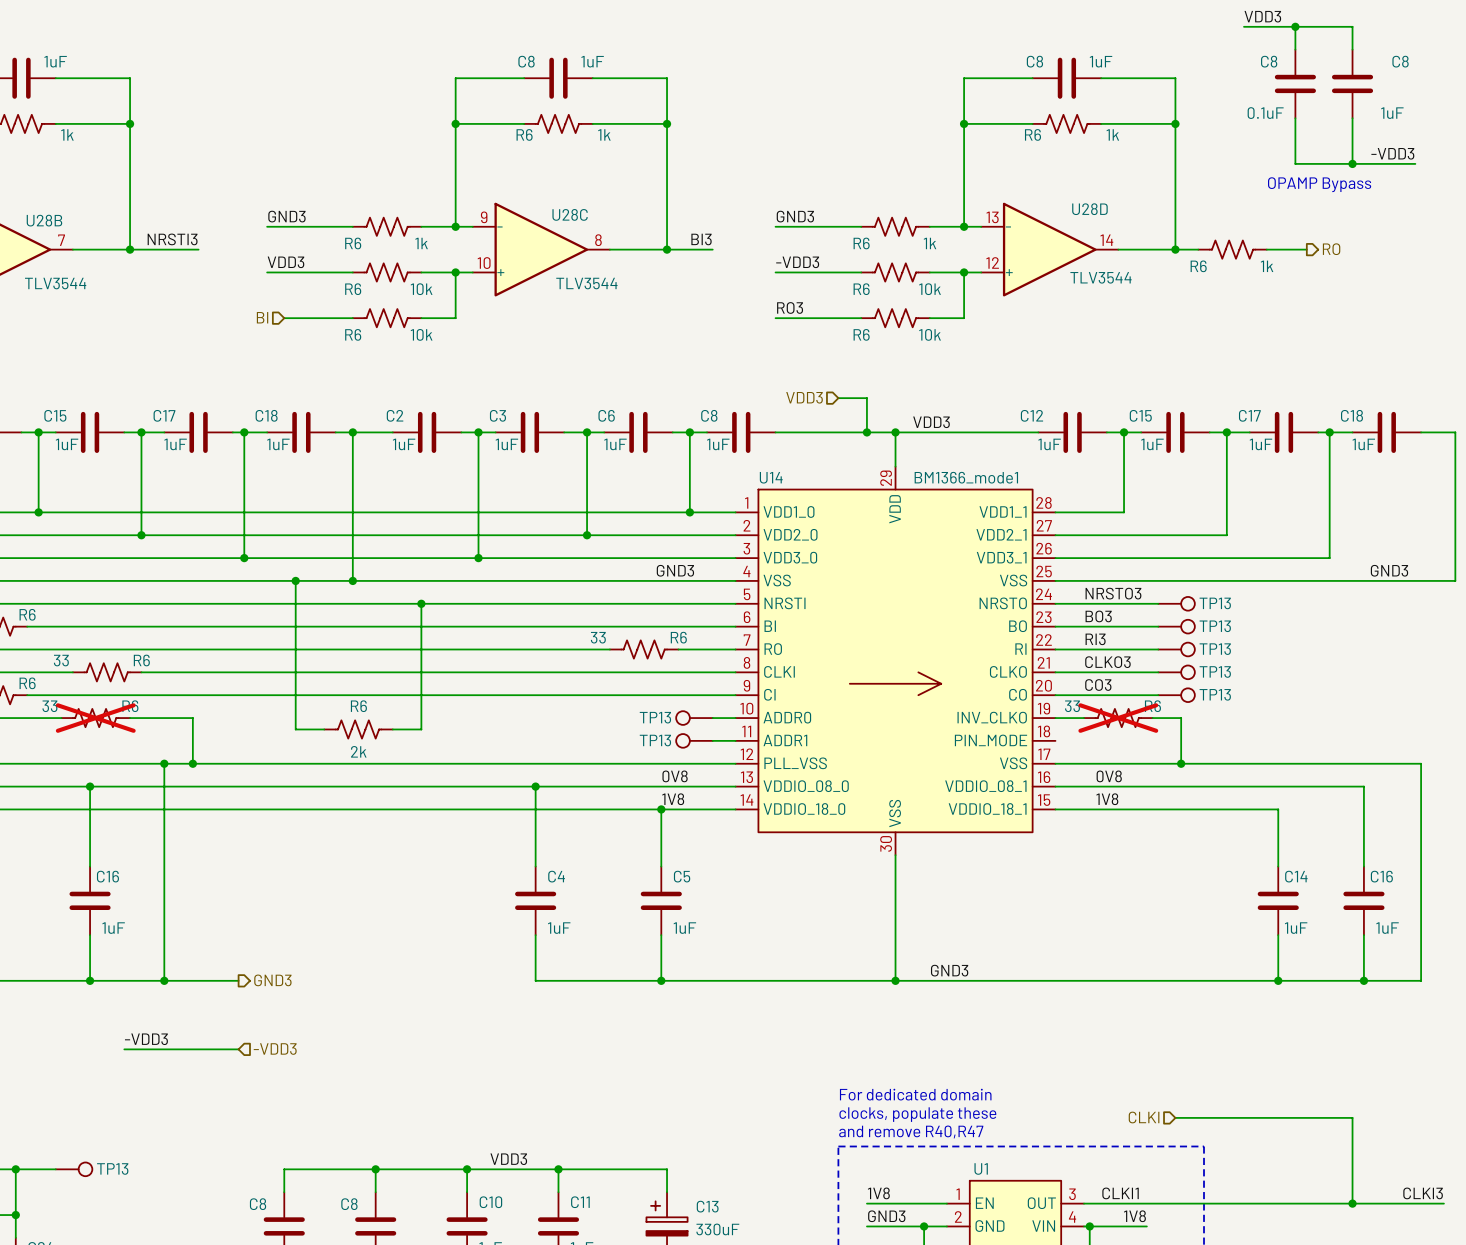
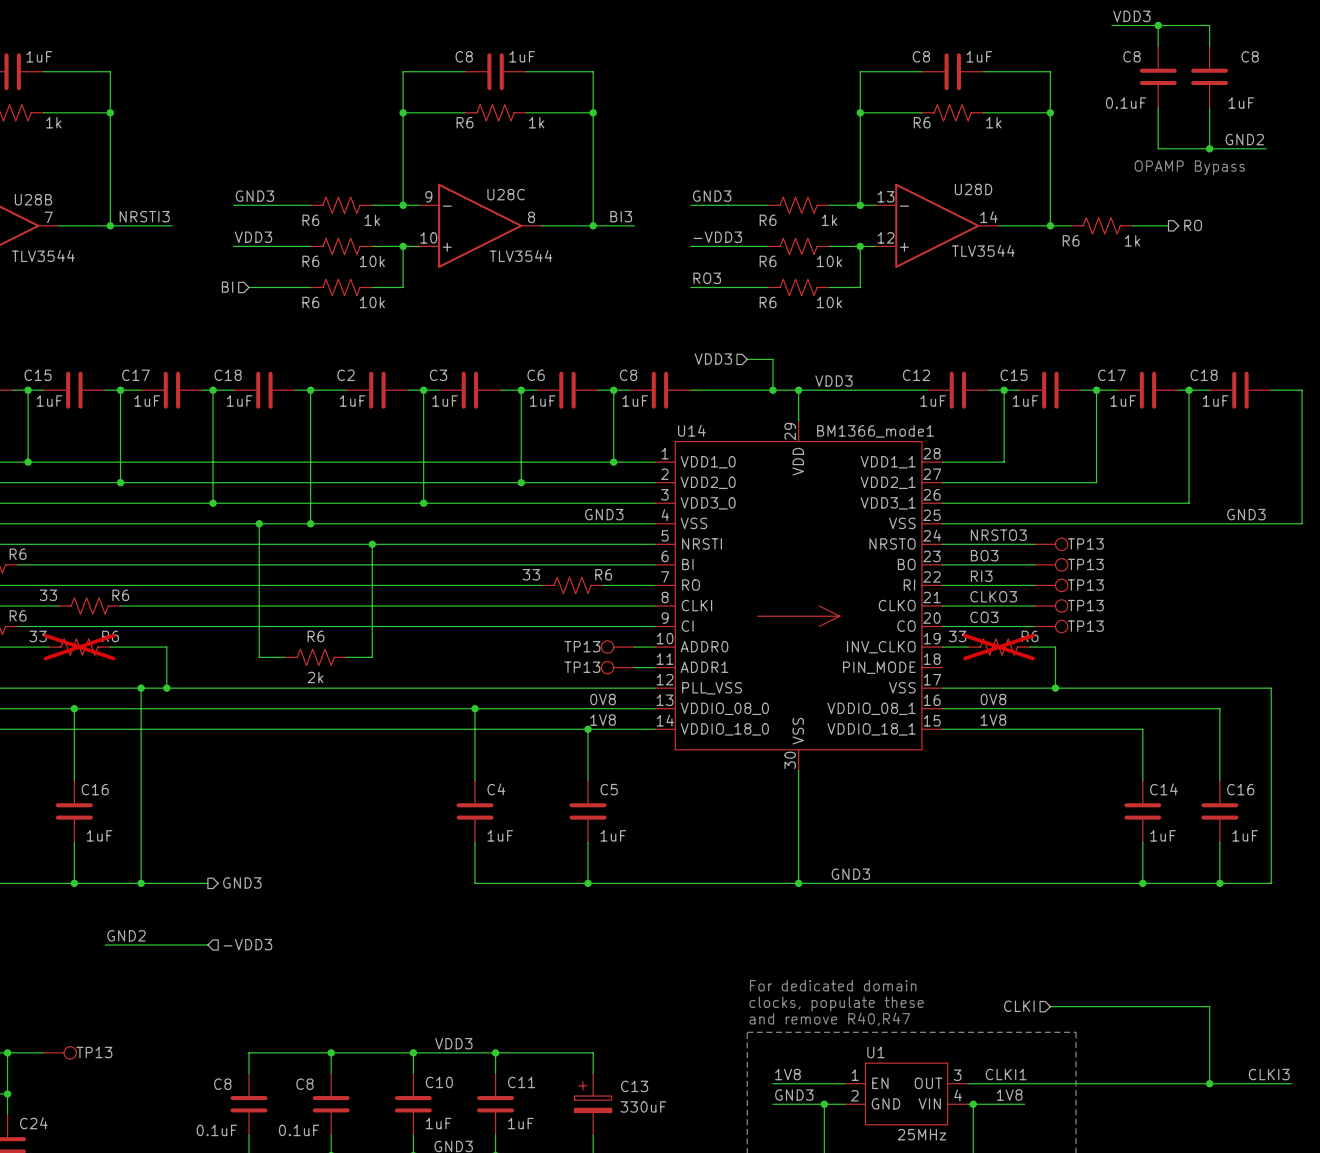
label: -VDD3 (1392, 153) -> GND2 (1244, 139)
label: -VDD3 (146, 1039) -> GND2 (126, 935)

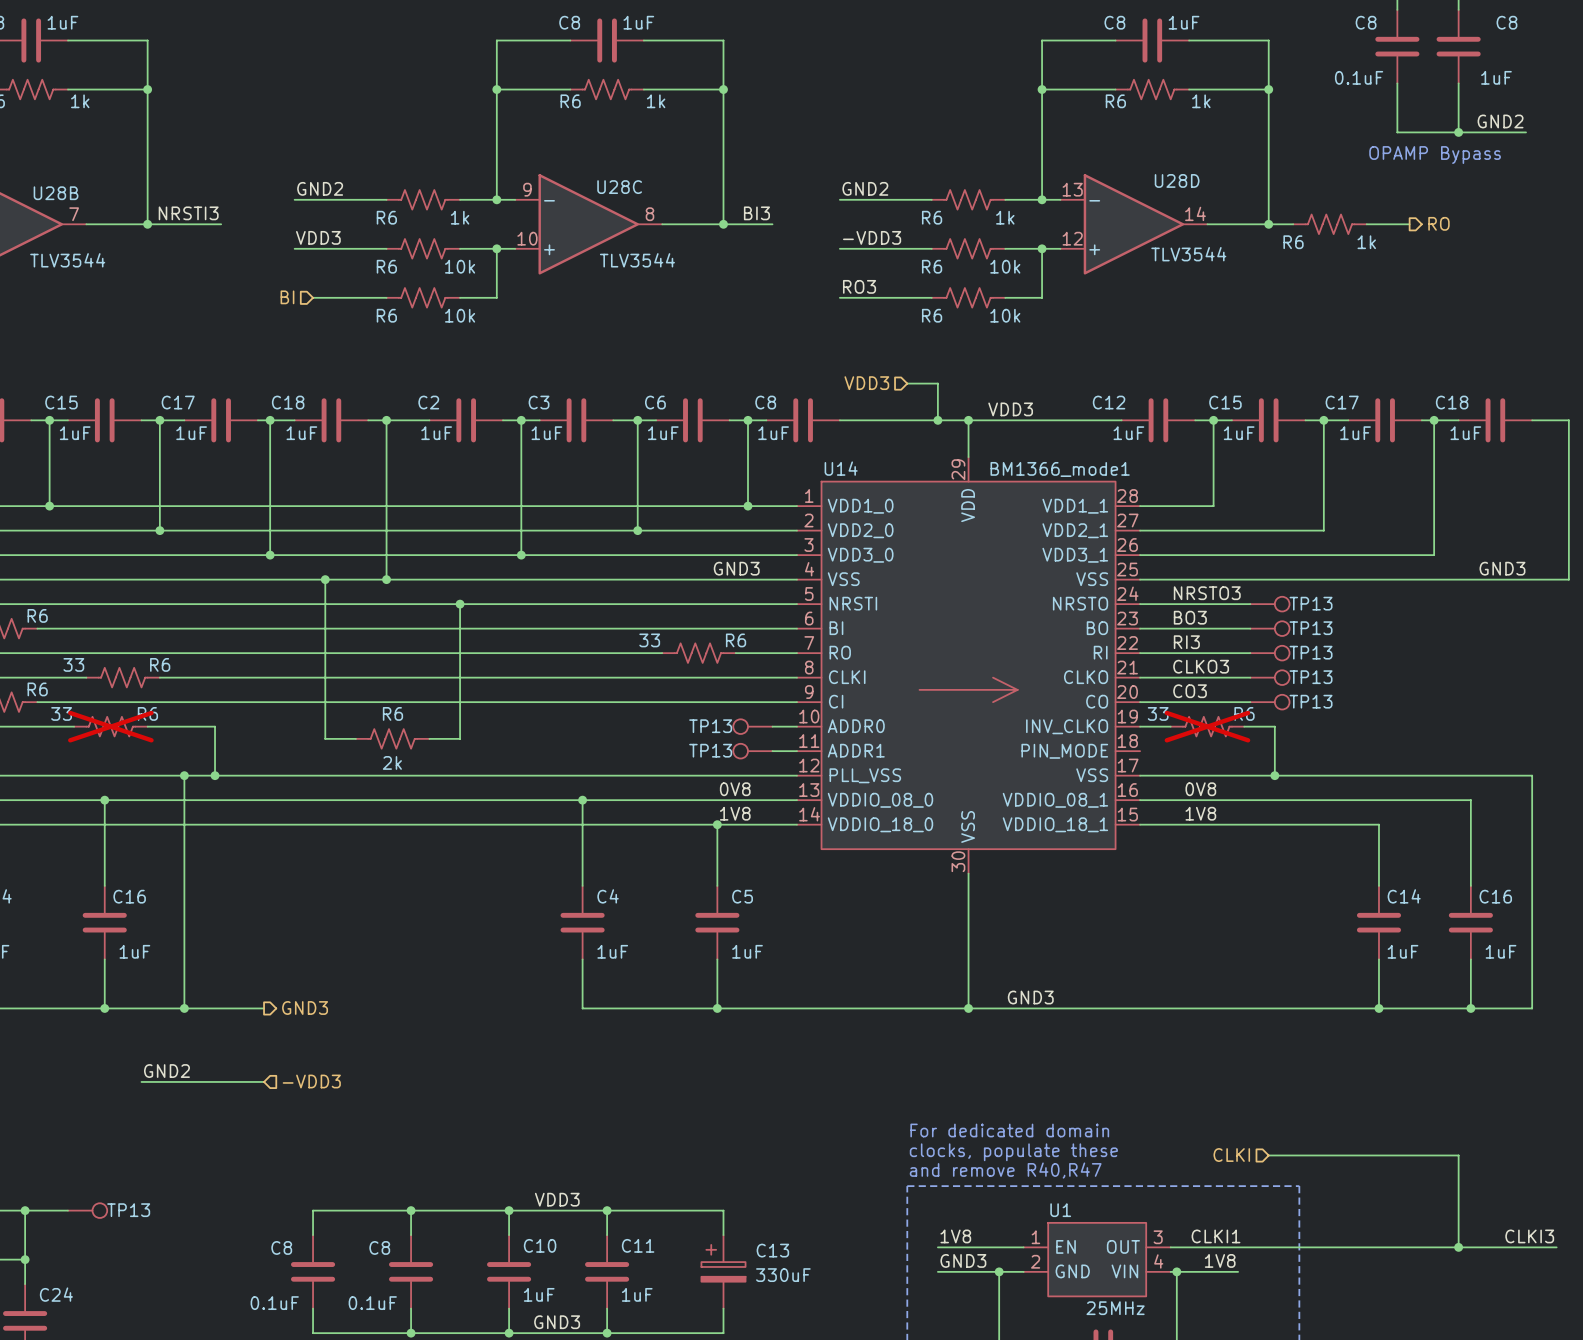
label: GND3 (254, 196) -> GND2 (320, 188)
label: GND3 (712, 196) -> GND2 (865, 188)

